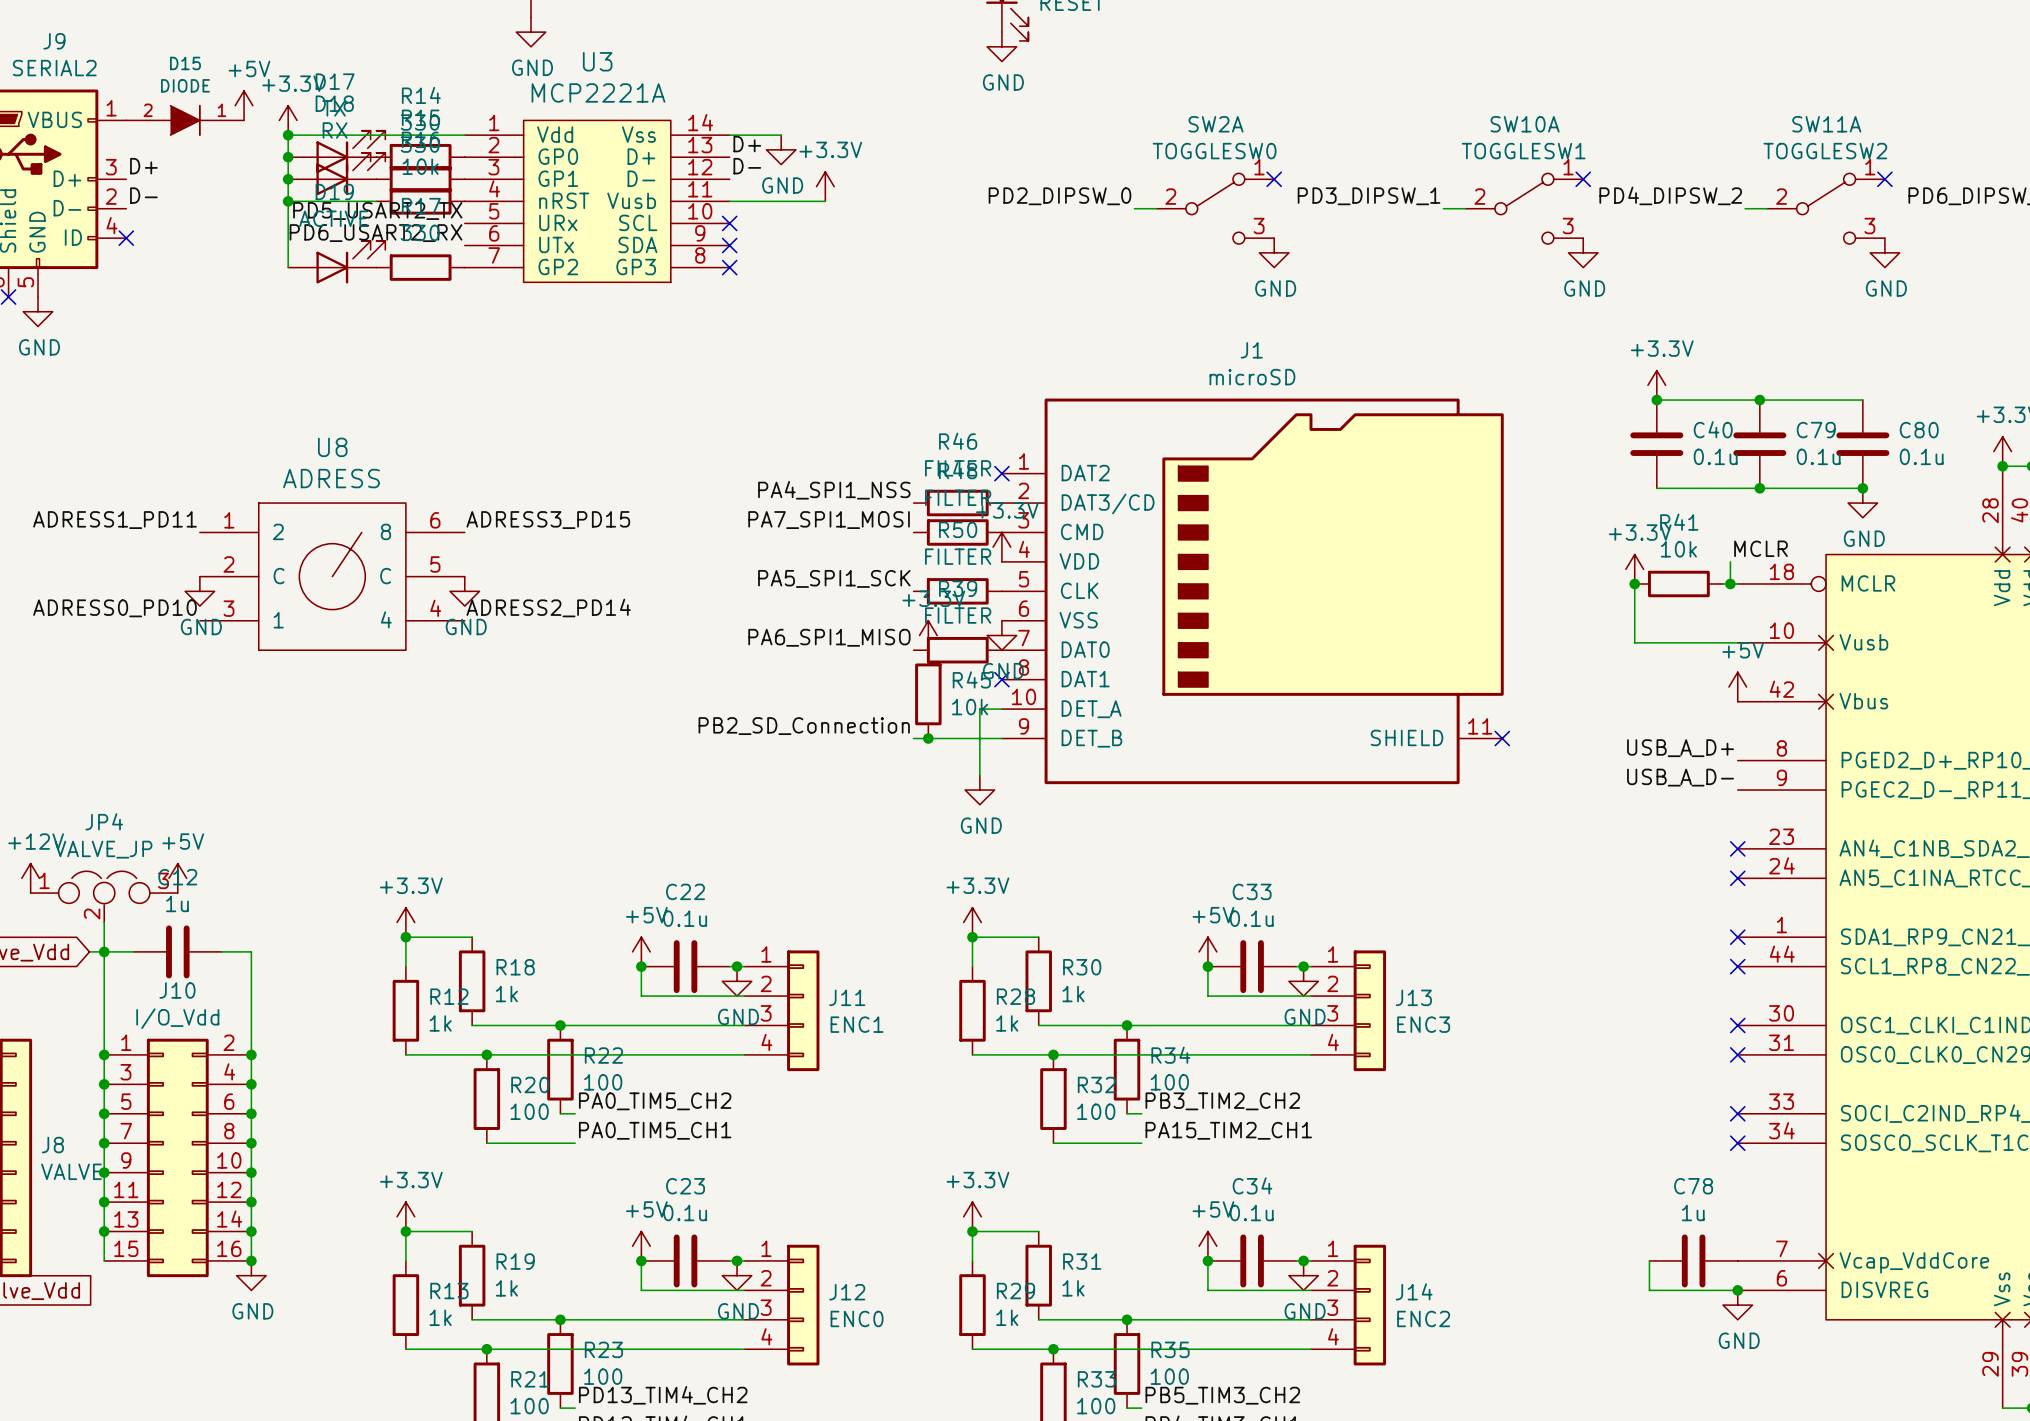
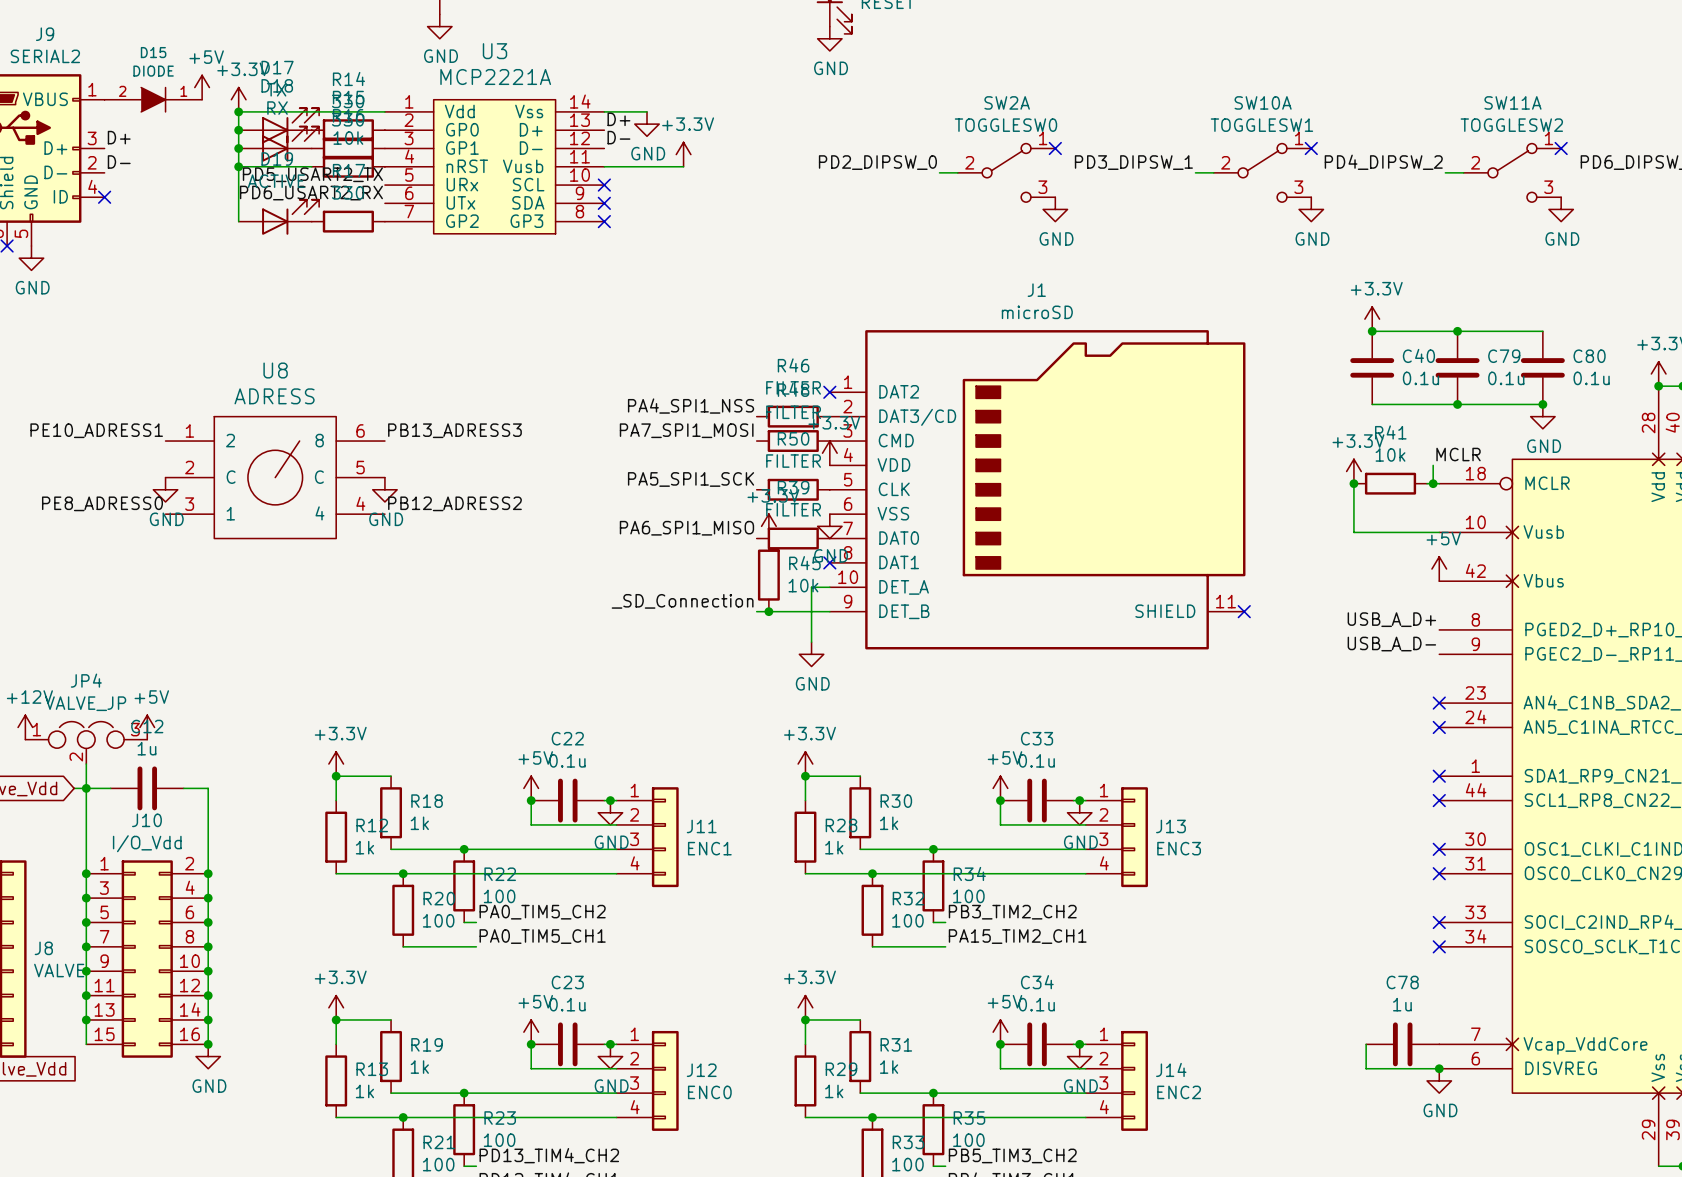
label: ADRESS1_PD11 (114, 520) -> PE10_ADRESS1 (96, 430)
label: ADRESS3_PD15 (548, 520) -> PB13_ADRESS3 (454, 430)
label: ADRESS0_PD10 (114, 608) -> PE8_ADRESS0 (102, 503)
label: ADRESS2_PD14 (548, 608) -> PB12_ADRESS2 (454, 503)
label: PB2_SD_Connection (804, 726) -> _SD_Connection (682, 601)

